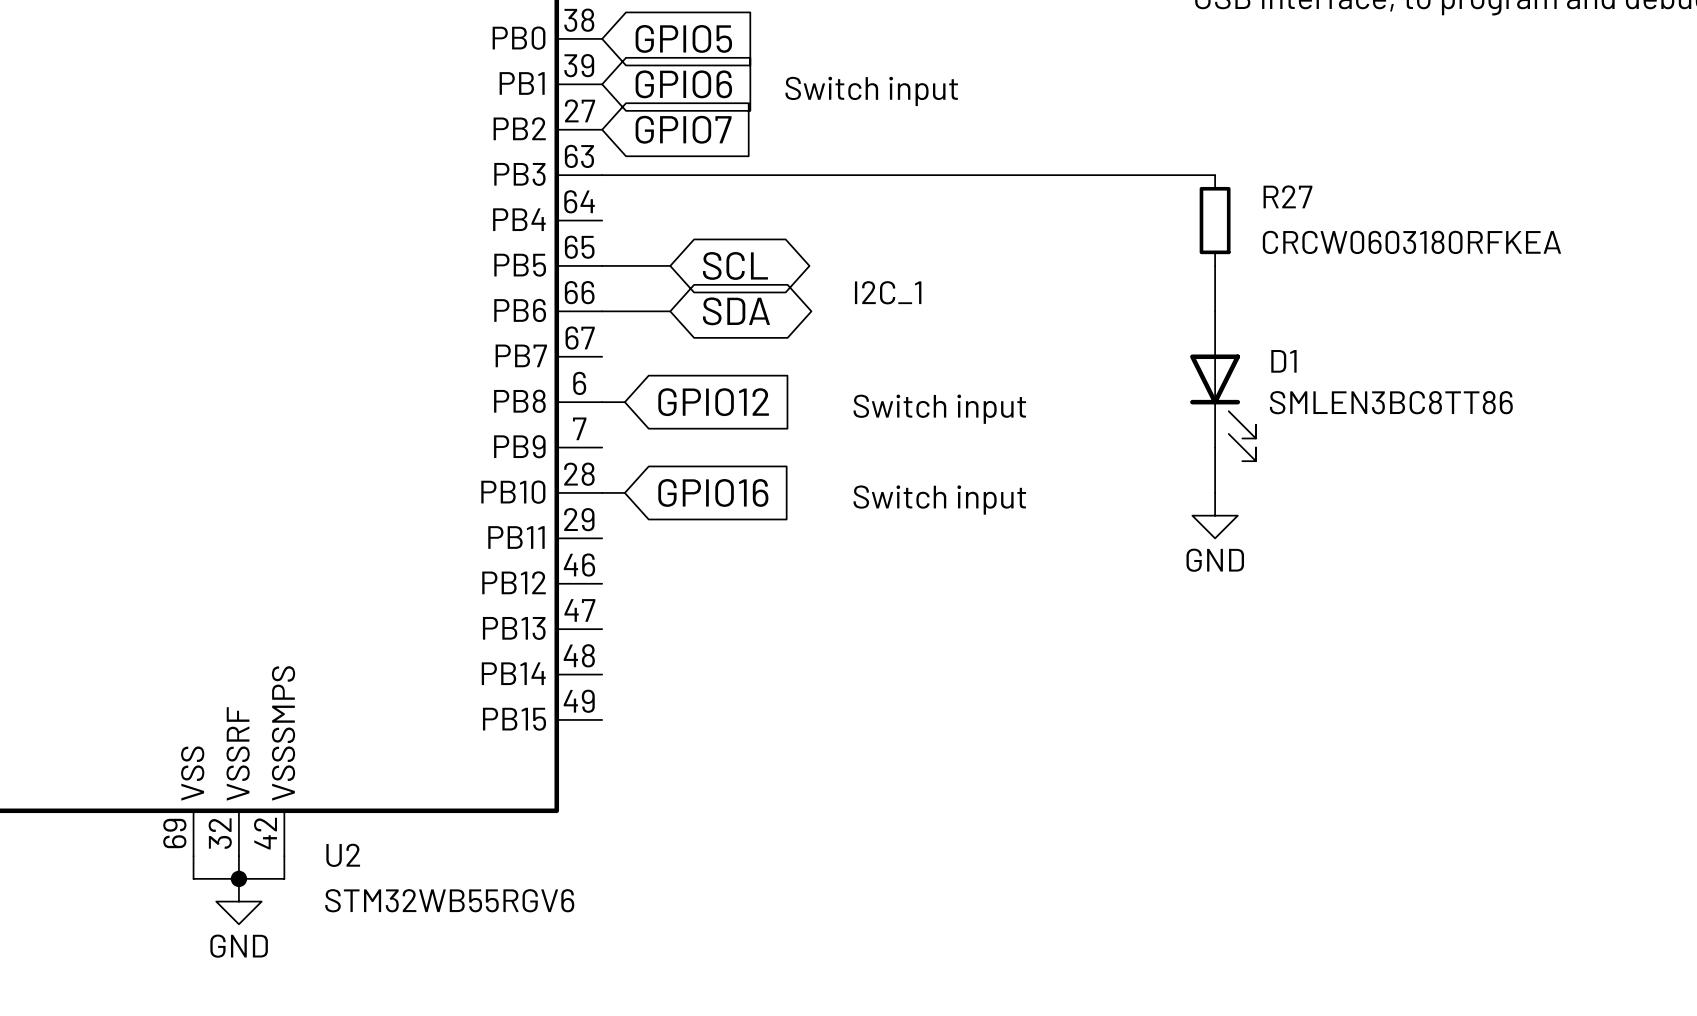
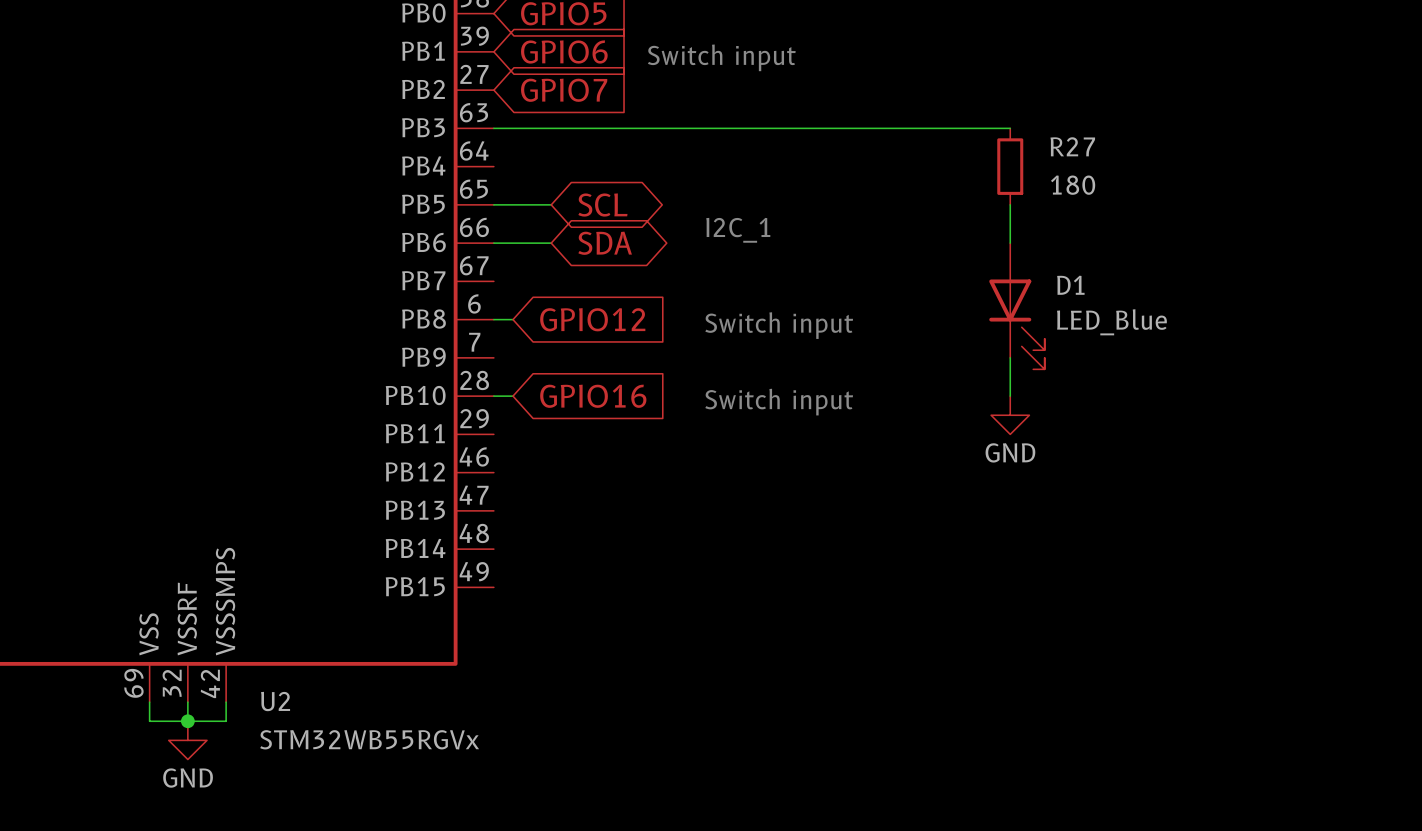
R27 value: CRCW0603180RFKEA (1411, 242) -> 180 (1073, 185)
D1 value: SMLEN3BC8TT86 (1391, 402) -> LED_Blue (1111, 322)
U2 value: STM32WB55RGV6 (449, 900) -> STM32WB55RGVx (369, 739)

